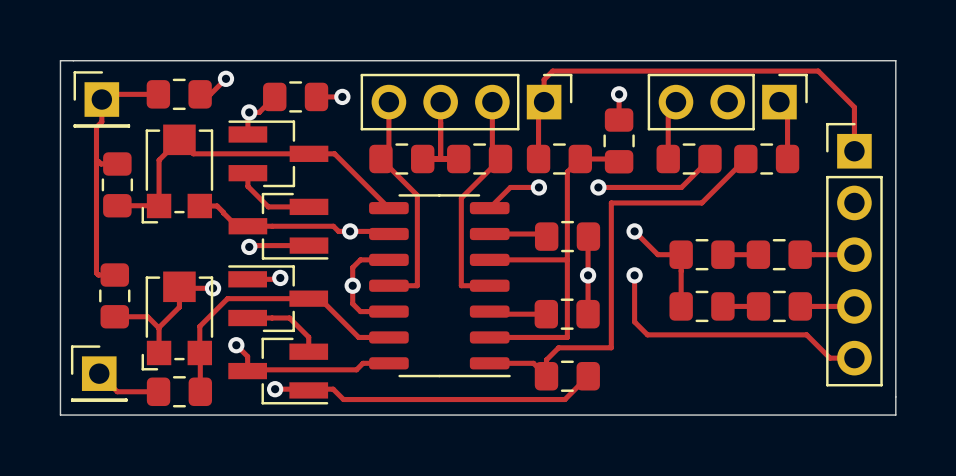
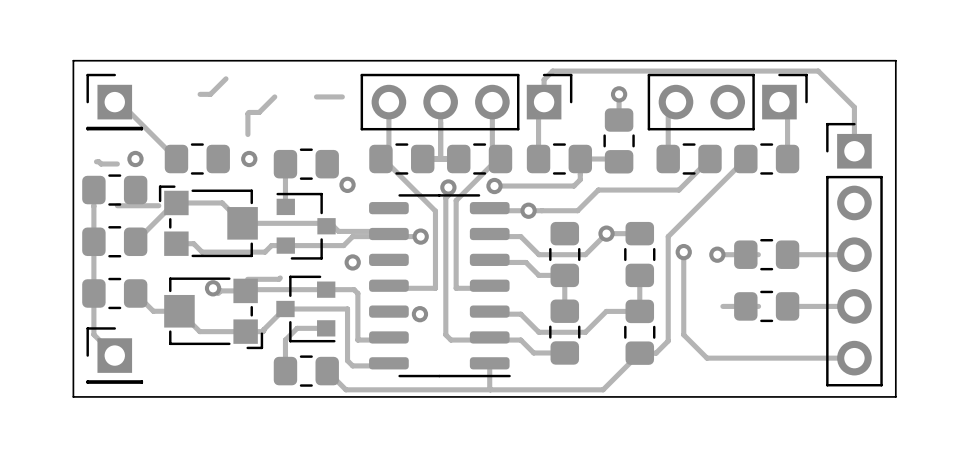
board edge: (73, 60) (60, 60) (60, 415) (895, 415) (895, 396) -> (73, 60) (73, 396) (895, 396)
via: (225, 78) -> none
track: (158, 94) (107, 94) (101, 99) (101, 121) (96, 127) (96, 273) (98, 275) (114, 275) -> none
part: (179, 94) -> none
part: (295, 96) -> none
via: (342, 96) -> none
part position: (101, 99) -> (114, 102)
track: none -> (114, 102) (119, 102) (176, 159)
via: (249, 112) -> none
part: (278, 153) -> none
via: none -> (135, 159)
part: none -> (197, 159)
via: none -> (249, 159)
track: (380, 159) (417, 195) (417, 285) (388, 285) -> none
track: none -> (383, 159) (435, 211) (435, 288) (388, 288)
track: none -> (497, 159) (456, 200) (456, 288) (489, 288)
track: (500, 159) (461, 198) (461, 285) (489, 285) -> none
track: (580, 159) (567, 171) (567, 337) (489, 337) -> (580, 159) (580, 179) (573, 186) (494, 186)
track: none -> (285, 164) (285, 206)
part: none -> (306, 164)
track: (247, 173) (247, 186) (268, 206) (308, 206) -> none
part: (177, 174) -> none
part rotation: 0° (117, 184) -> 90° clockwise (114, 190)
via: none -> (347, 184)
via: none -> (494, 186)
track: none -> (448, 187) (448, 195) (445, 197) (445, 334) (450, 340) (520, 340) (533, 352) (564, 352)
via: none -> (448, 187)
track: (538, 187) (510, 187) (489, 208) -> none
via: (538, 187) -> none
track: (598, 187) (681, 187) -> (489, 210) (577, 210) (598, 190) (678, 190) (681, 187)
via: (598, 187) -> none
track: none -> (93, 190) (93, 334) (114, 355)
track: (701, 202) (611, 202) (611, 347) (558, 347) (546, 359) (546, 376) (533, 363) (489, 363) -> (701, 202) (668, 236) (668, 341) (656, 353) (639, 353) (603, 389) (345, 389) (327, 371)
track: (159, 206) (159, 160) (179, 139) (193, 153) (334, 153) (388, 208) -> none
track: (199, 206) (217, 206) (236, 226) (326, 226) -> (135, 241) (174, 202) (222, 202) (242, 223) (323, 223) (326, 226)
via: none -> (528, 210)
part: none -> (208, 221)
part: (278, 226) -> none
part: none -> (306, 226)
via: (350, 231) -> none
track: (634, 231) (657, 254) (681, 254) (681, 306) -> none
via: (634, 231) -> none
via: none -> (606, 233)
track: none -> (639, 233) (606, 233) (585, 254) (538, 254) (520, 236) (489, 236)
track: (489, 234) (544, 234) (546, 236) -> none
track: none -> (420, 236) (352, 236) (343, 245) (308, 245)
via: none -> (420, 236)
part rotation: 0° (567, 236) -> 90° clockwise (564, 254)
track: (588, 236) (588, 314) -> none
part: none -> (114, 241)
track: (271, 245) (249, 246) -> (271, 245) (265, 252) (202, 252) (193, 243) (176, 243)
via: (249, 246) -> none
via: none -> (683, 252)
part: none -> (639, 254)
part: (702, 254) -> none
via: none -> (717, 254)
part position: (779, 254) -> (766, 254)
track: (388, 259) (360, 259) (352, 267) (352, 303) (360, 311) (388, 311) -> none
track: (489, 259) (567, 259) -> none
via: none -> (352, 262)
track: none -> (489, 262) (525, 262) (538, 275) (564, 275) (564, 311)
via: (588, 275) -> none
track: (634, 275) (634, 321) (647, 334) (806, 334) (829, 358) -> (683, 252) (683, 334) (707, 358) (829, 358)
via: (634, 275) -> none
via: (280, 277) -> none
via: (352, 285) -> none
track: (213, 288) (179, 286) (179, 307) (158, 327) -> none
track: none -> (135, 293) (153, 311) (179, 311) (199, 331) (262, 331) (284, 309) (347, 309) (347, 360) (352, 365) (388, 365)
track: none -> (218, 293) (220, 290) (246, 289) (354, 289) (357, 293) (357, 340) (388, 340)
part rotation: 0° (114, 295) -> 90° clockwise (114, 293)
part: (278, 298) -> none
part: (702, 306) -> none
part position: (779, 306) -> (766, 306)
part: none -> (305, 309)
via: none -> (419, 314)
track: (520, 314) (546, 314) -> (520, 314) (538, 332) (585, 332) (606, 311) (639, 311) (639, 275)
part rotation: 0° (567, 314) -> 90° clockwise (564, 332)
track: (114, 316) (147, 316) (159, 328) (159, 352) -> none
track: (247, 318) (289, 318) (308, 337) (308, 350) -> none
part rotation: 0° (177, 321) -> 90° counterclockwise (213, 313)
track: none -> (326, 328) (297, 328) (285, 340) (285, 371)
part: none -> (639, 332)
track: (388, 337) (358, 337) (319, 298) (227, 298) (199, 326) (200, 391) -> none
track: (236, 345) (247, 356) (247, 369) (356, 369) (363, 363) (388, 363) -> none
via: (236, 345) -> none
track: none -> (489, 365) (490, 389)
part: (278, 371) -> none
part: none -> (306, 371)
track: (99, 373) (117, 391) (158, 391) -> none
part position: (99, 373) -> (114, 355)
part: (567, 376) -> none
track: (588, 376) (564, 399) (343, 399) (333, 389) (275, 389) -> none
via: (275, 389) -> none
part: (179, 391) -> none

